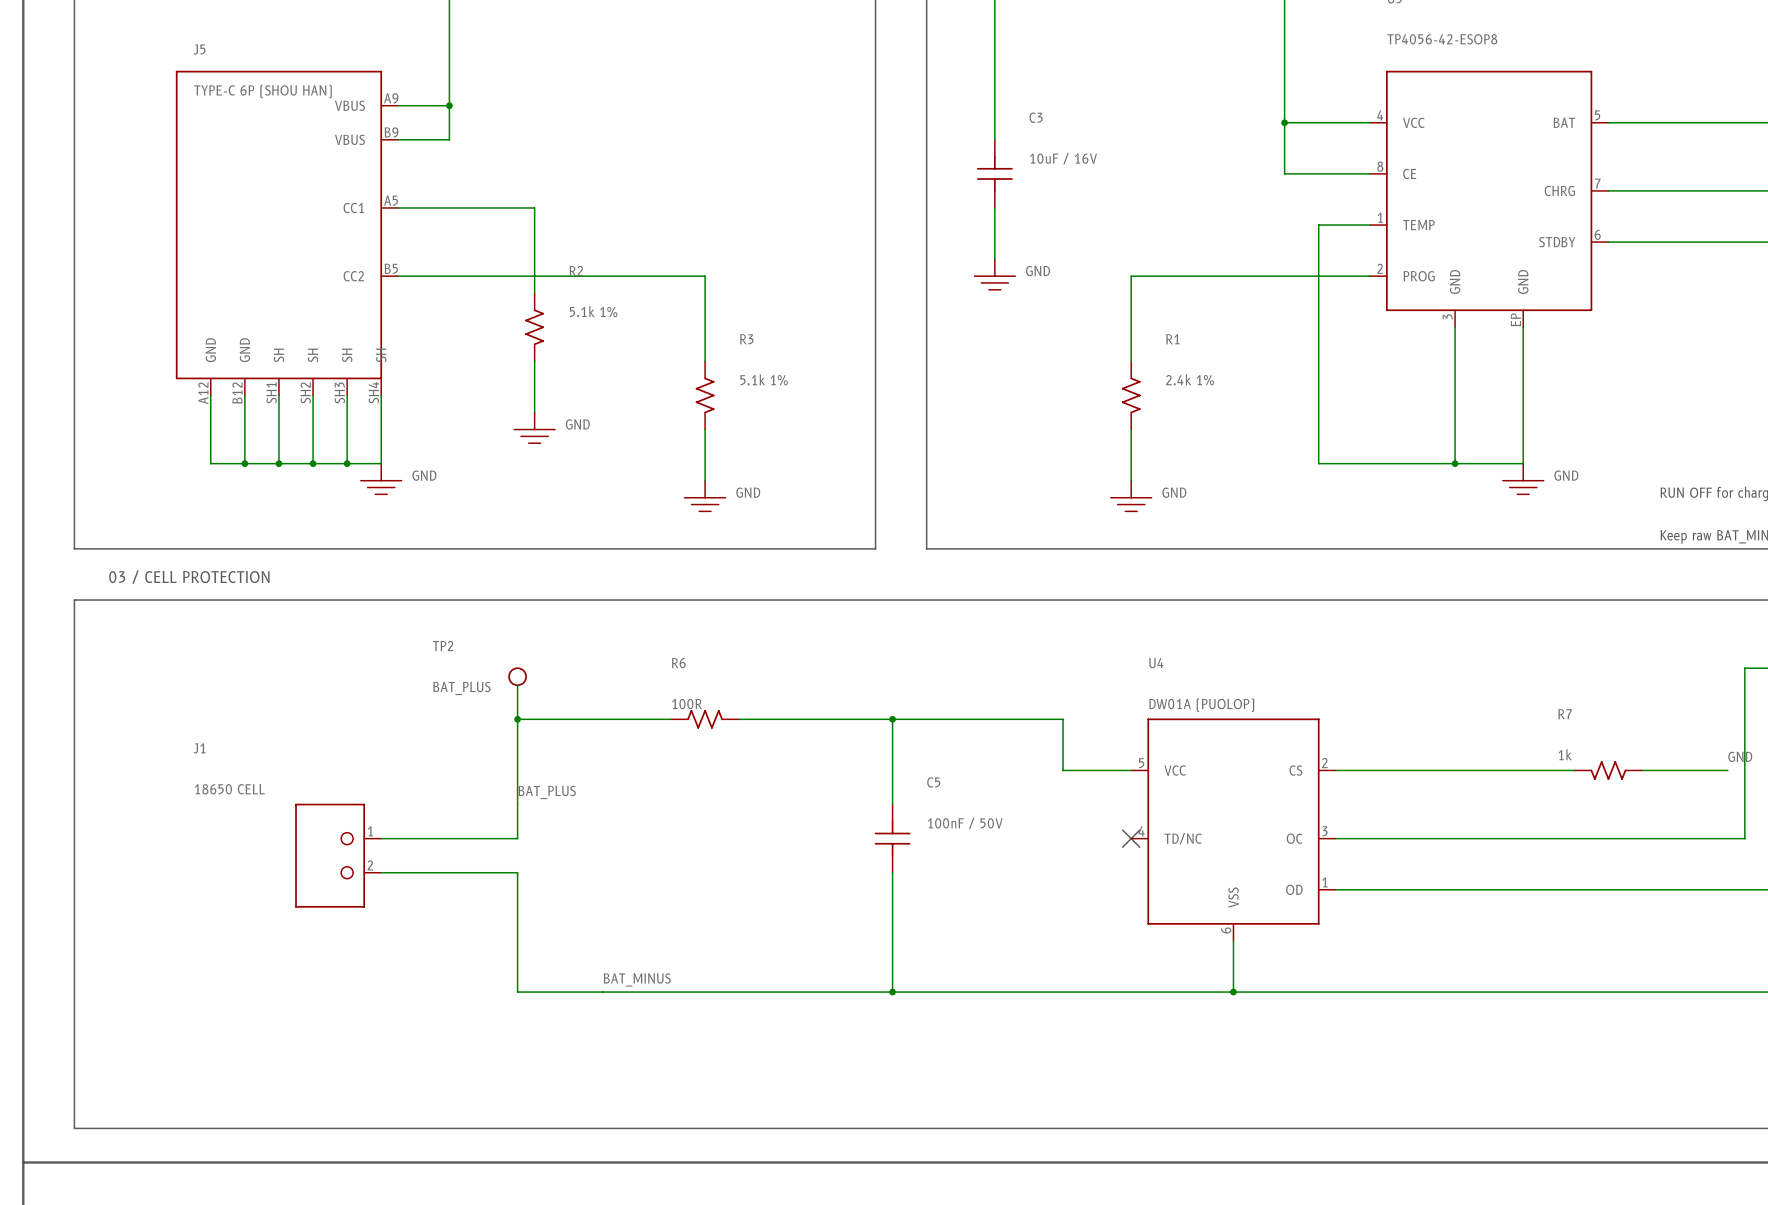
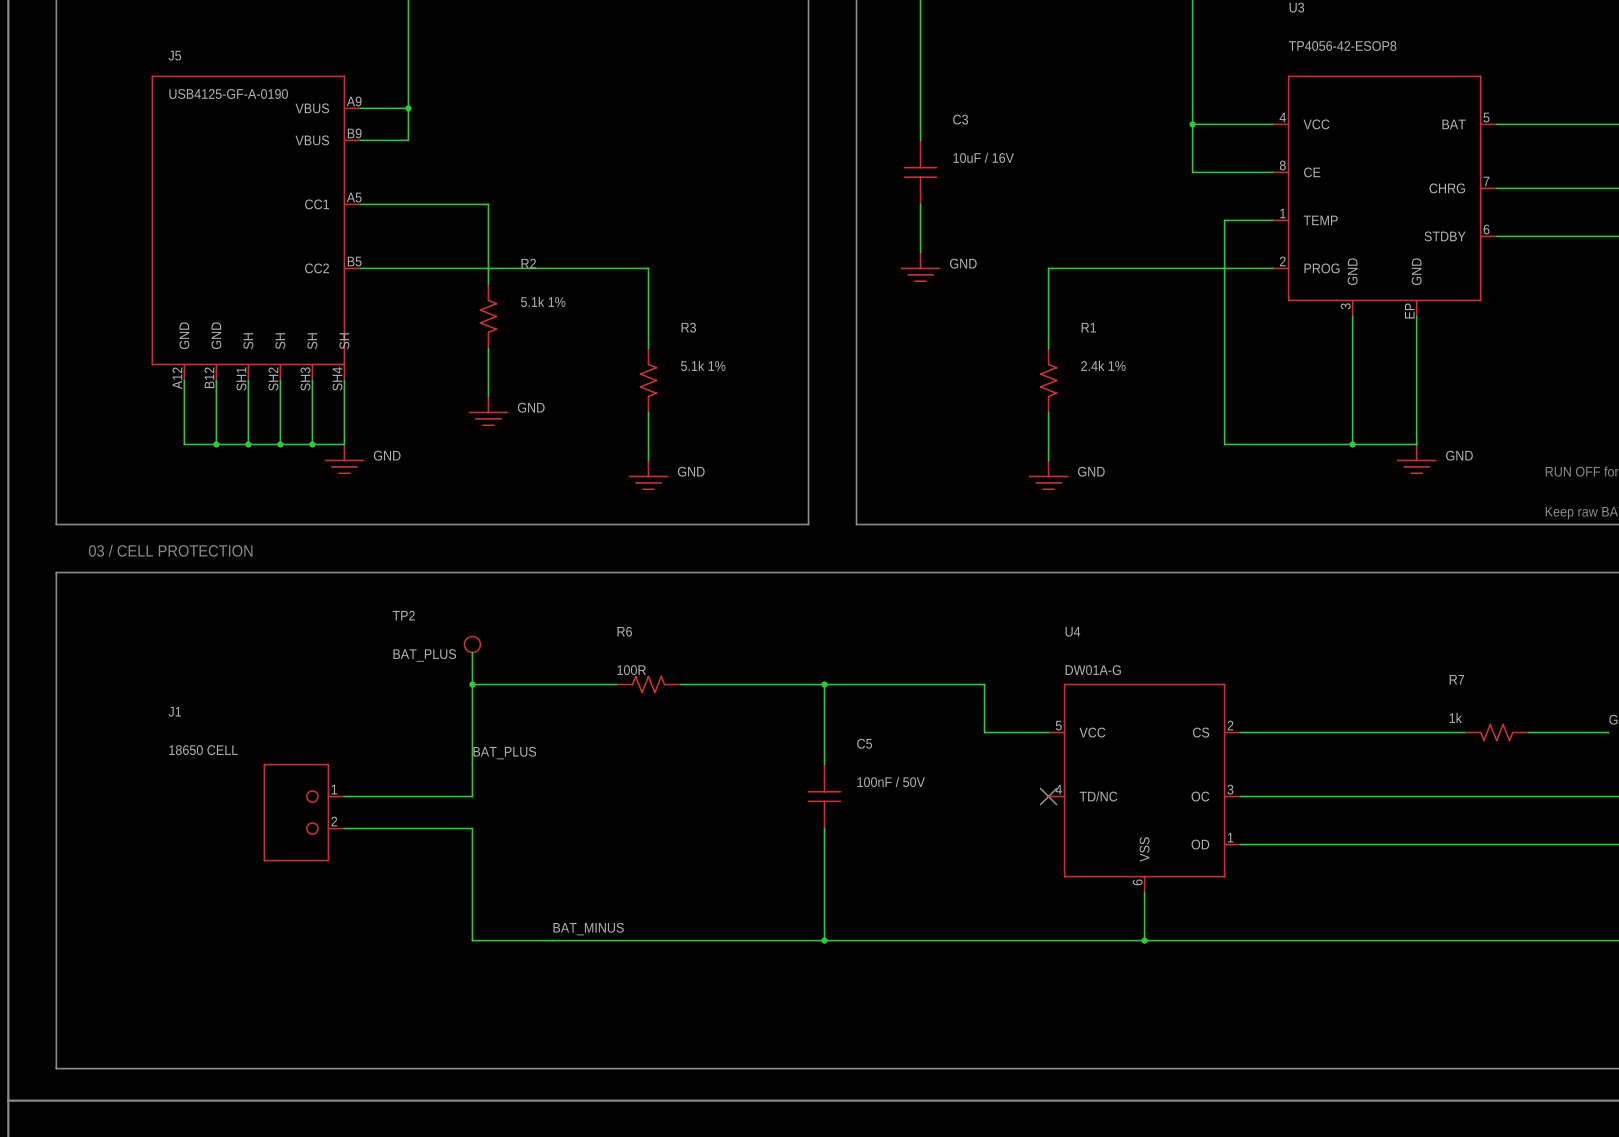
J5 value: TYPE-C 6P (SHOU HAN) (263, 91) -> USB4125-GF-A-0190 (228, 94)
U4 value: DW01A (PUOLOP) (1201, 705) -> DW01A-G (1093, 670)

